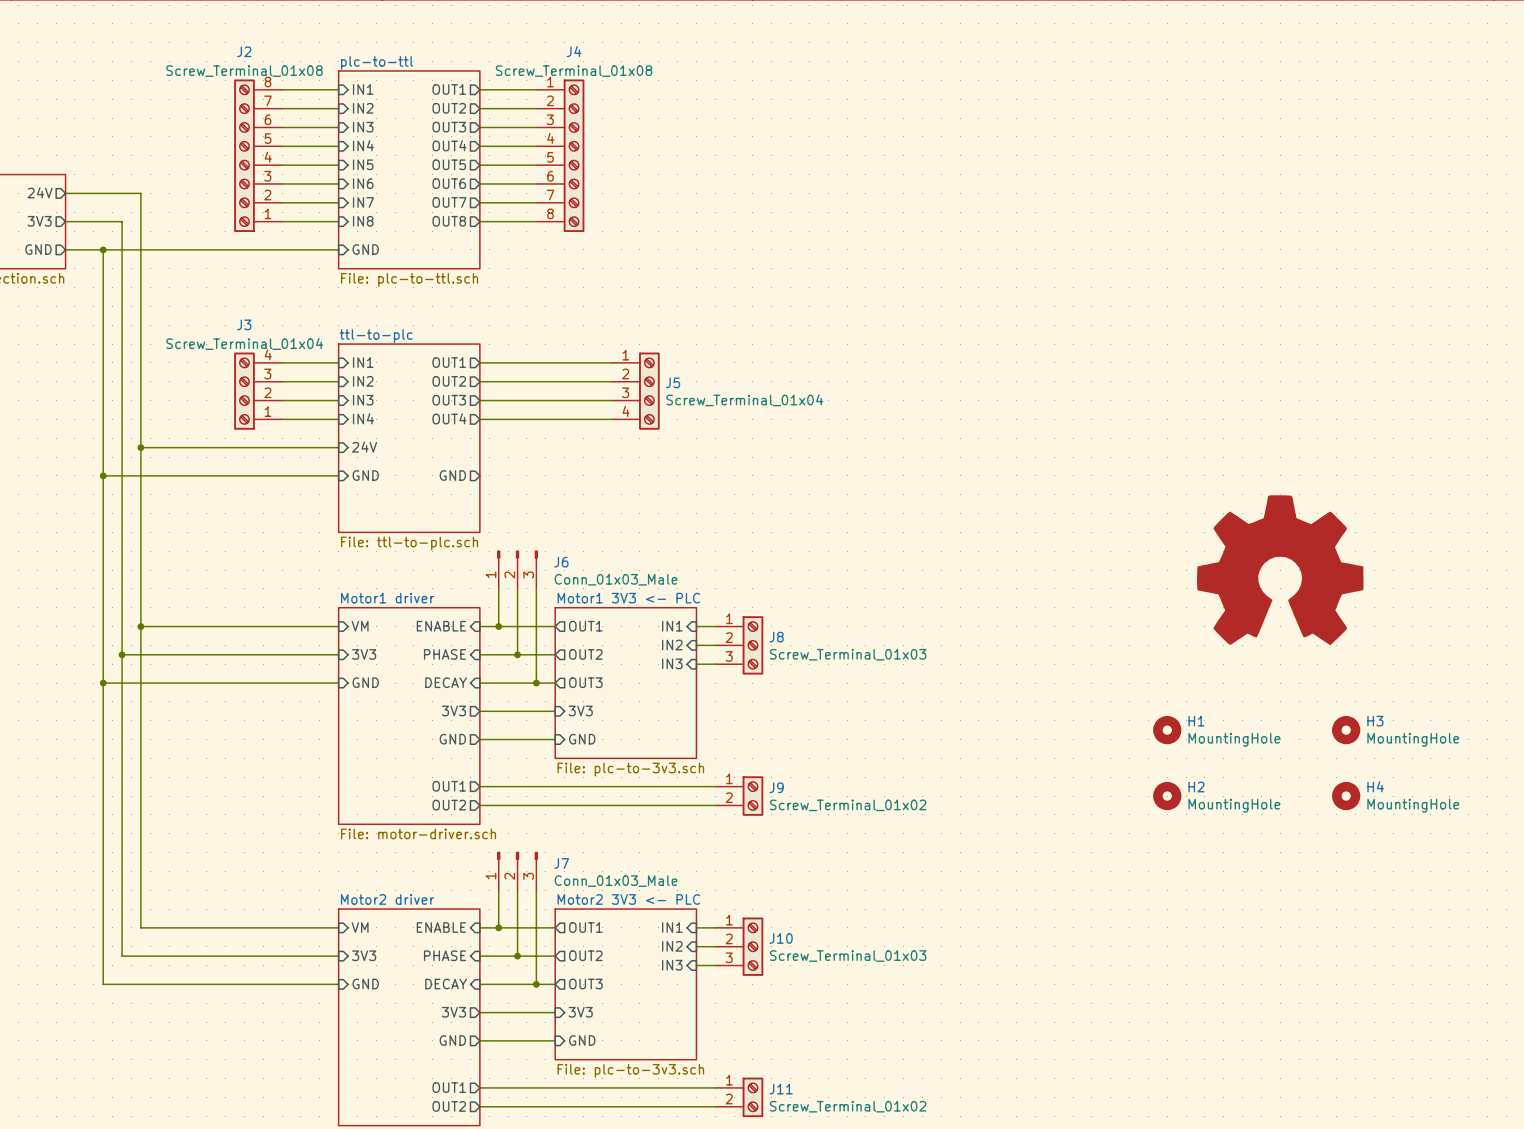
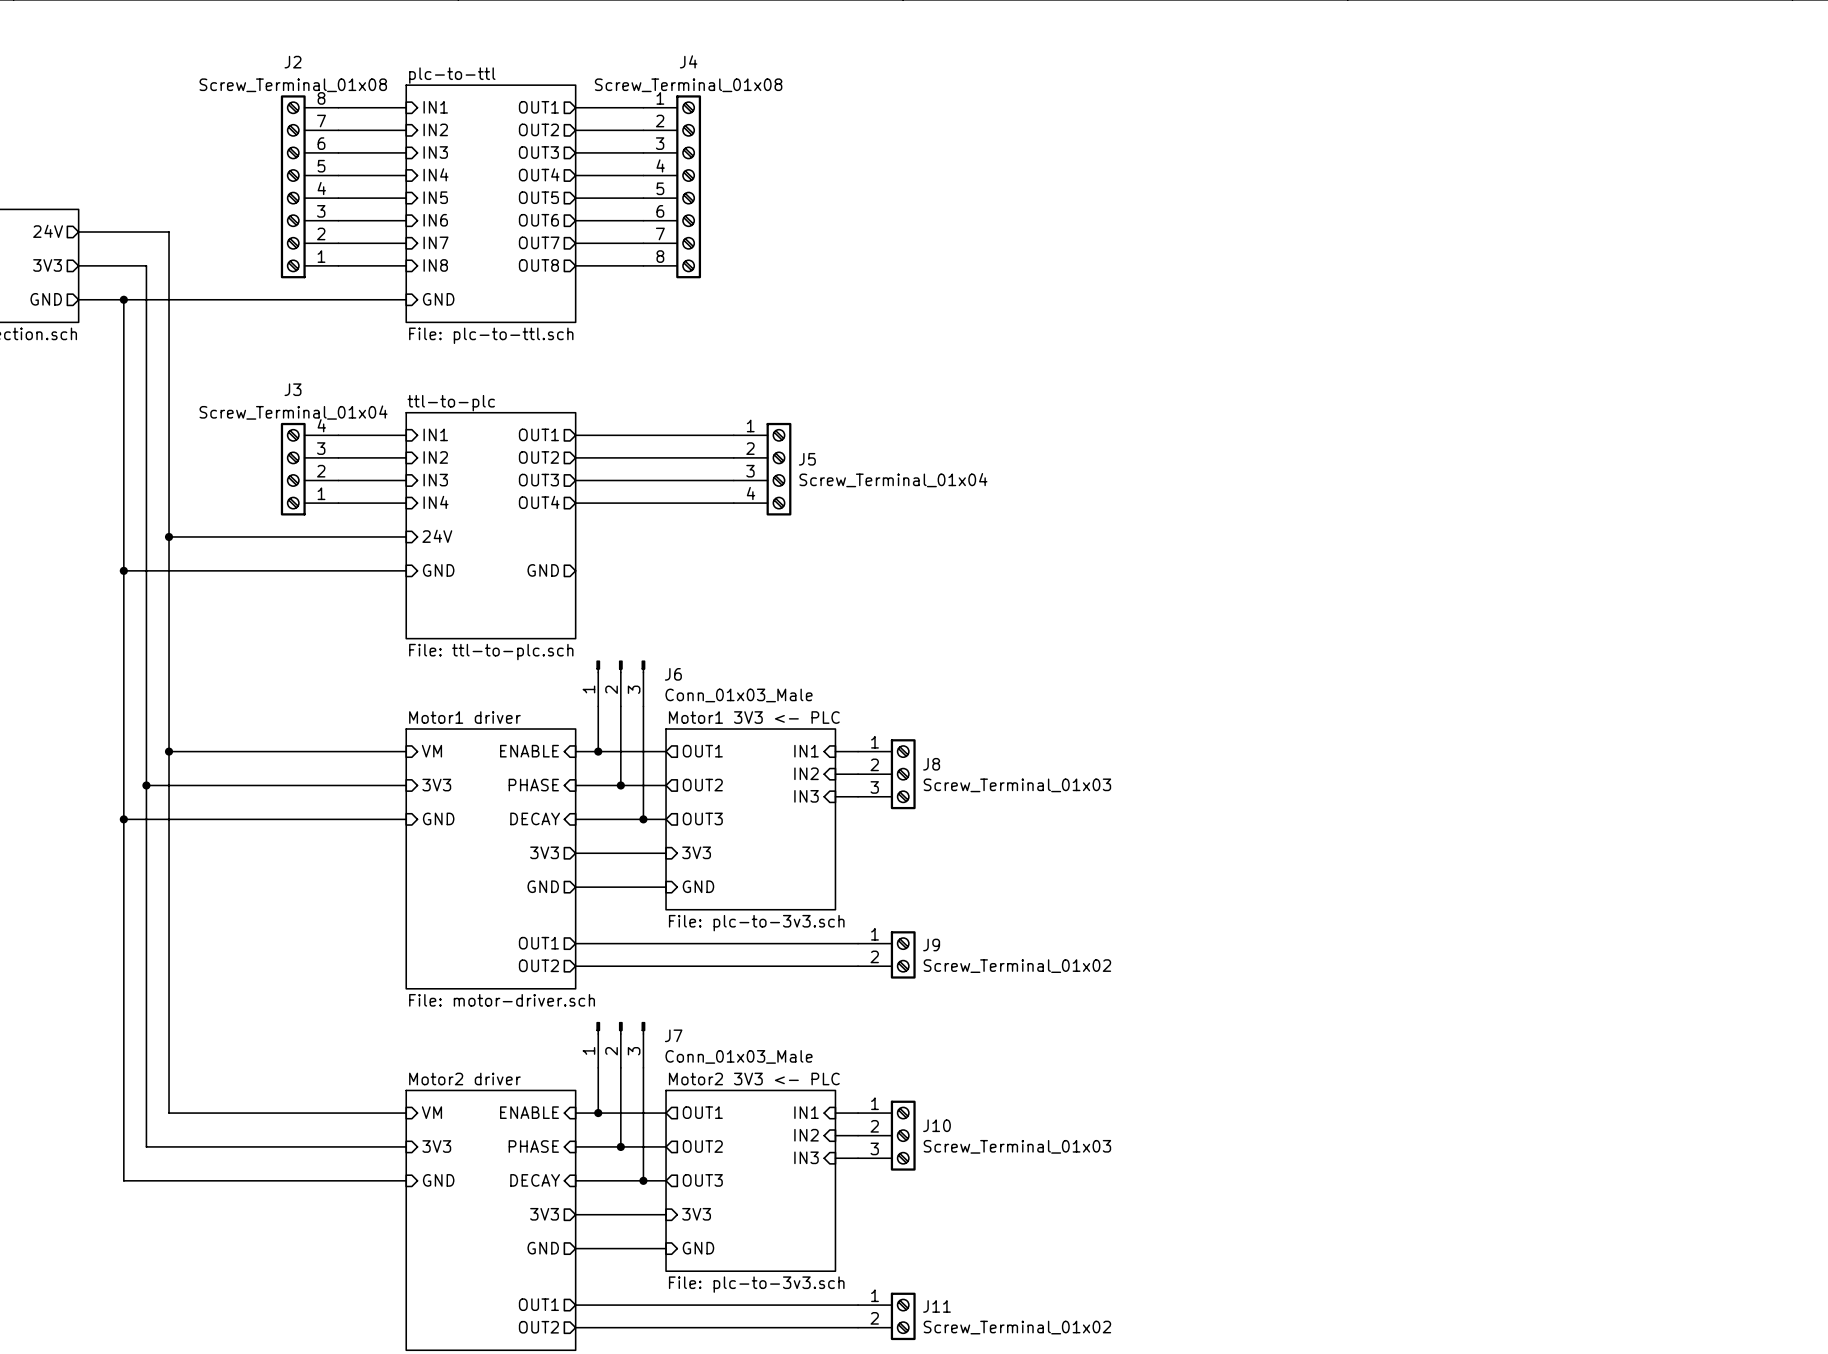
power symbol: (1280, 570) -> none
H1: MountingHole (1167, 730) -> none
H3: MountingHole (1346, 730) -> none
H2: MountingHole (1167, 796) -> none
H4: MountingHole (1346, 796) -> none

